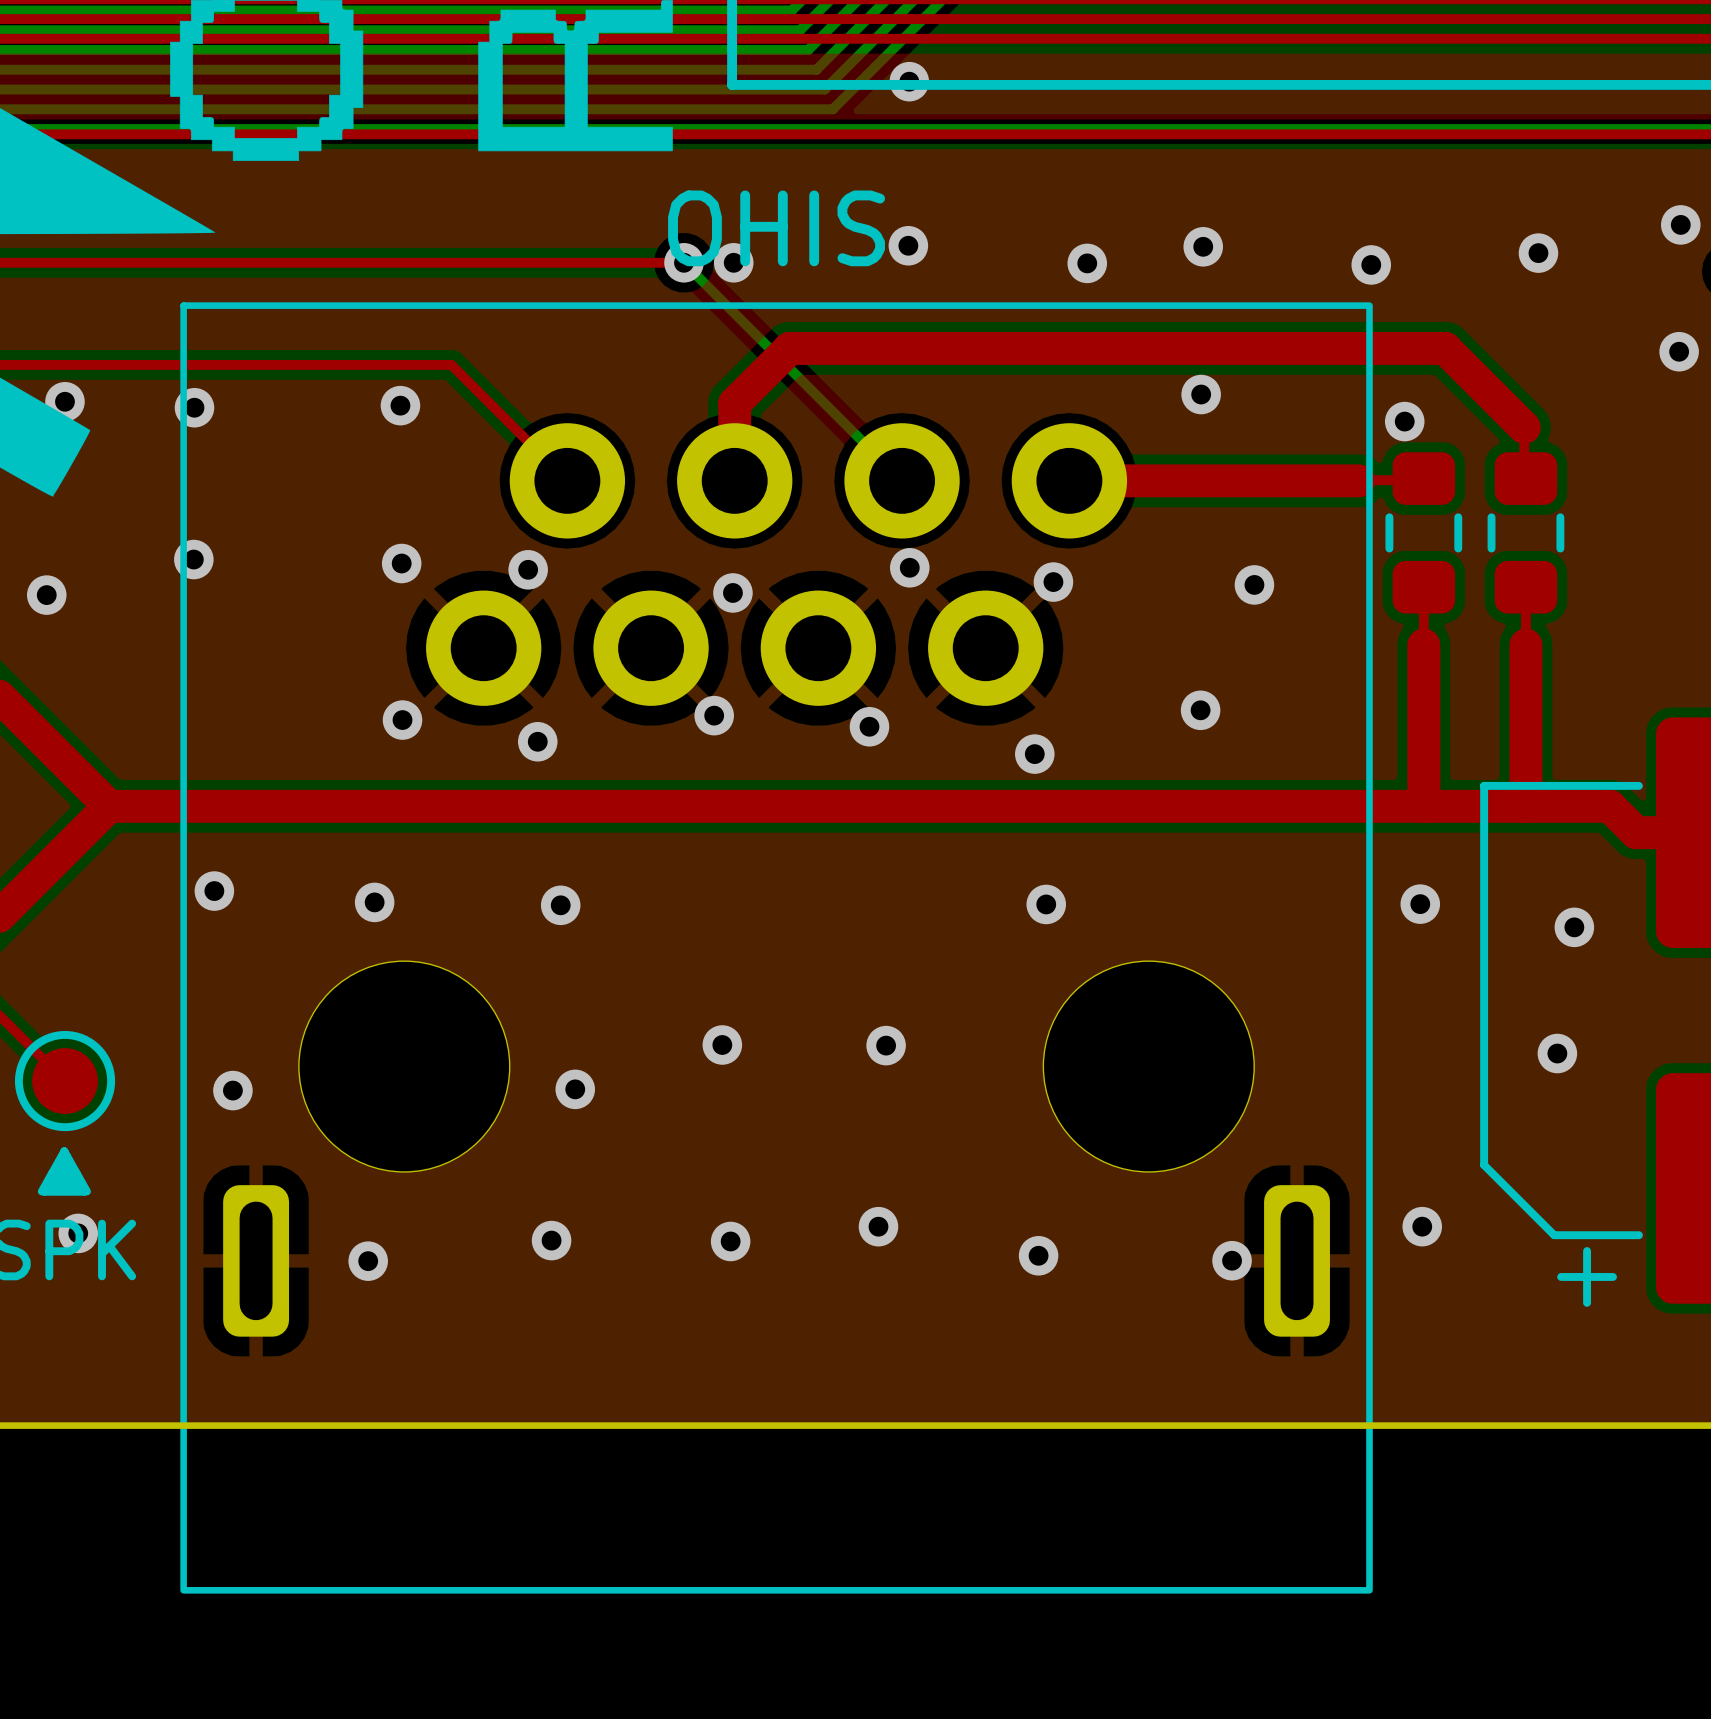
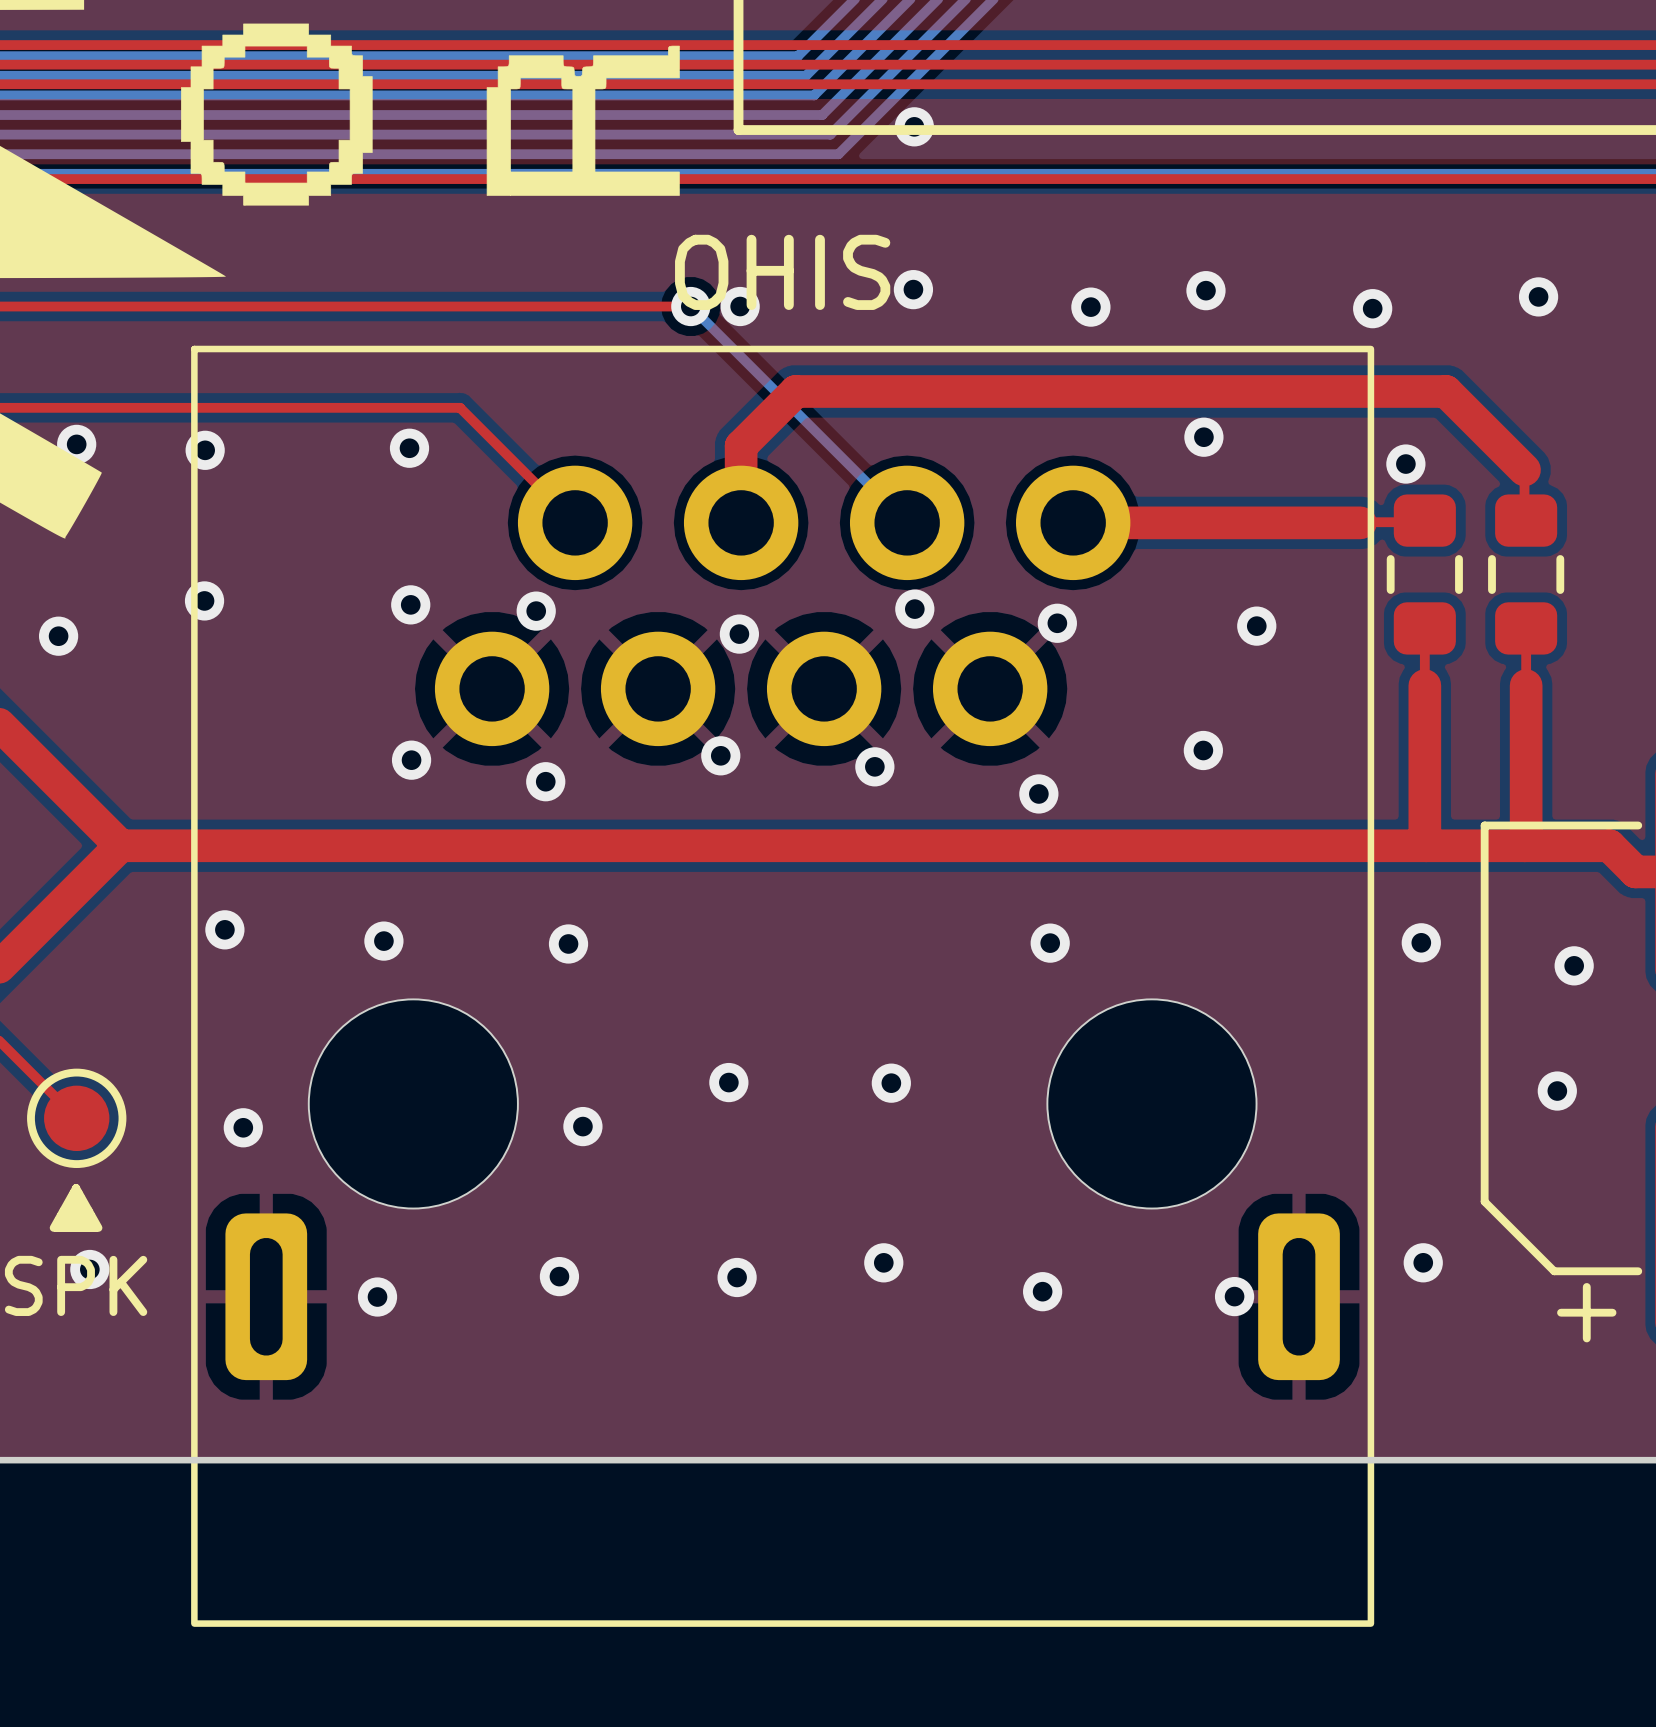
part footprint: [180, 302, 1373, 1594] -> [191, 345, 1375, 1627]

